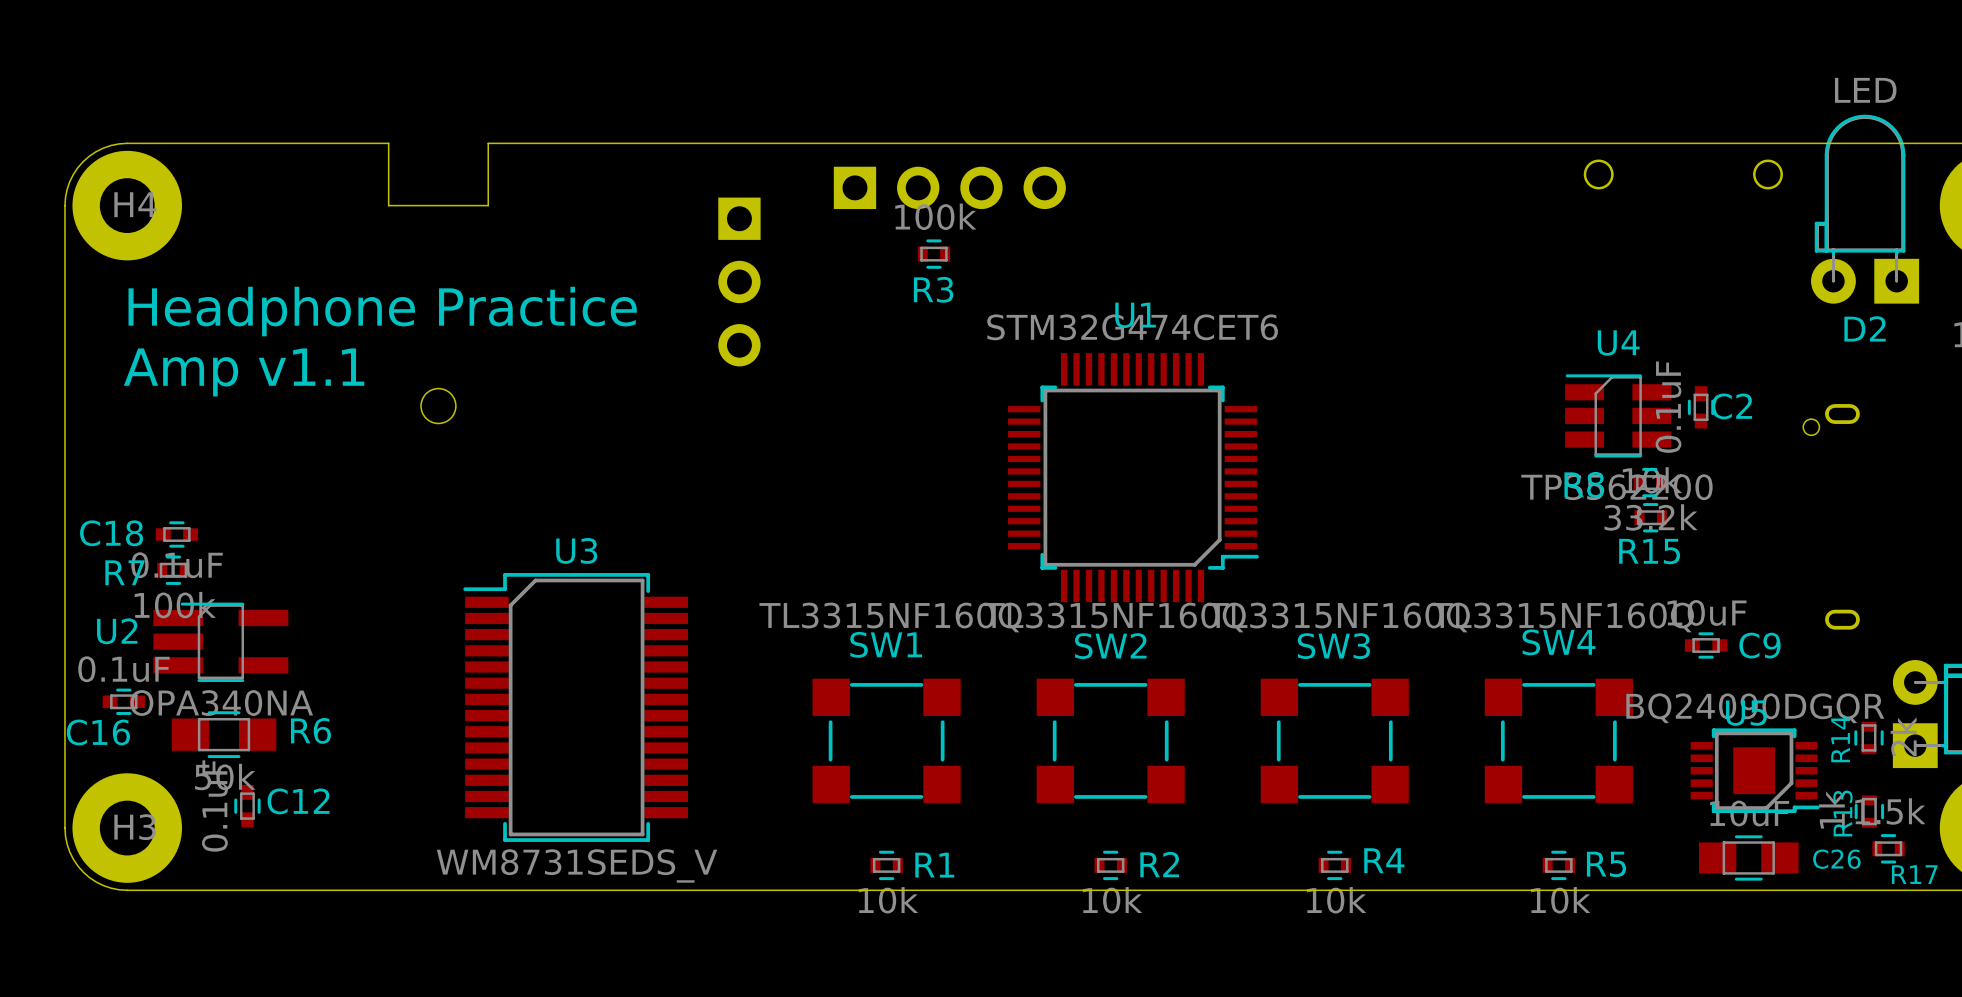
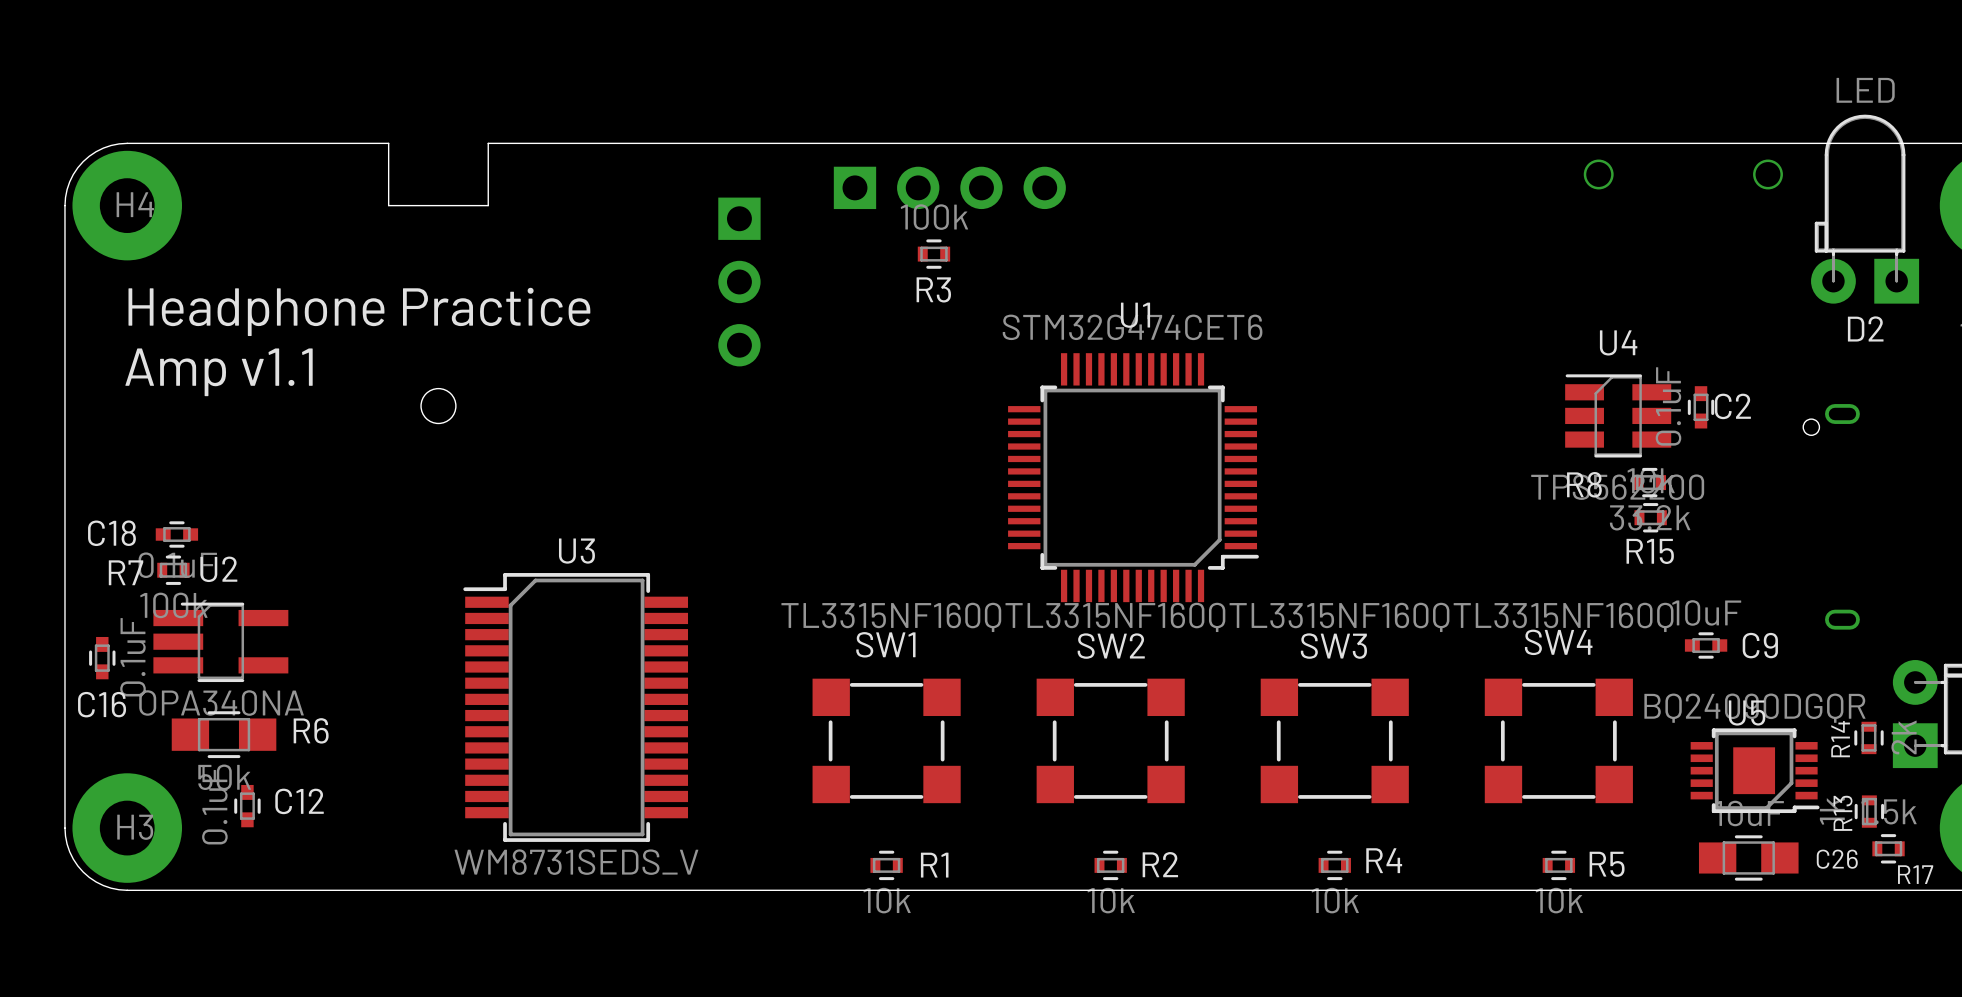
U2 name position: U2 (117, 631) -> U2 (218, 569)
C16 rotation: 0° (123, 701) -> 90° clockwise (102, 658)
C16 position: (123, 701) -> (102, 658)

